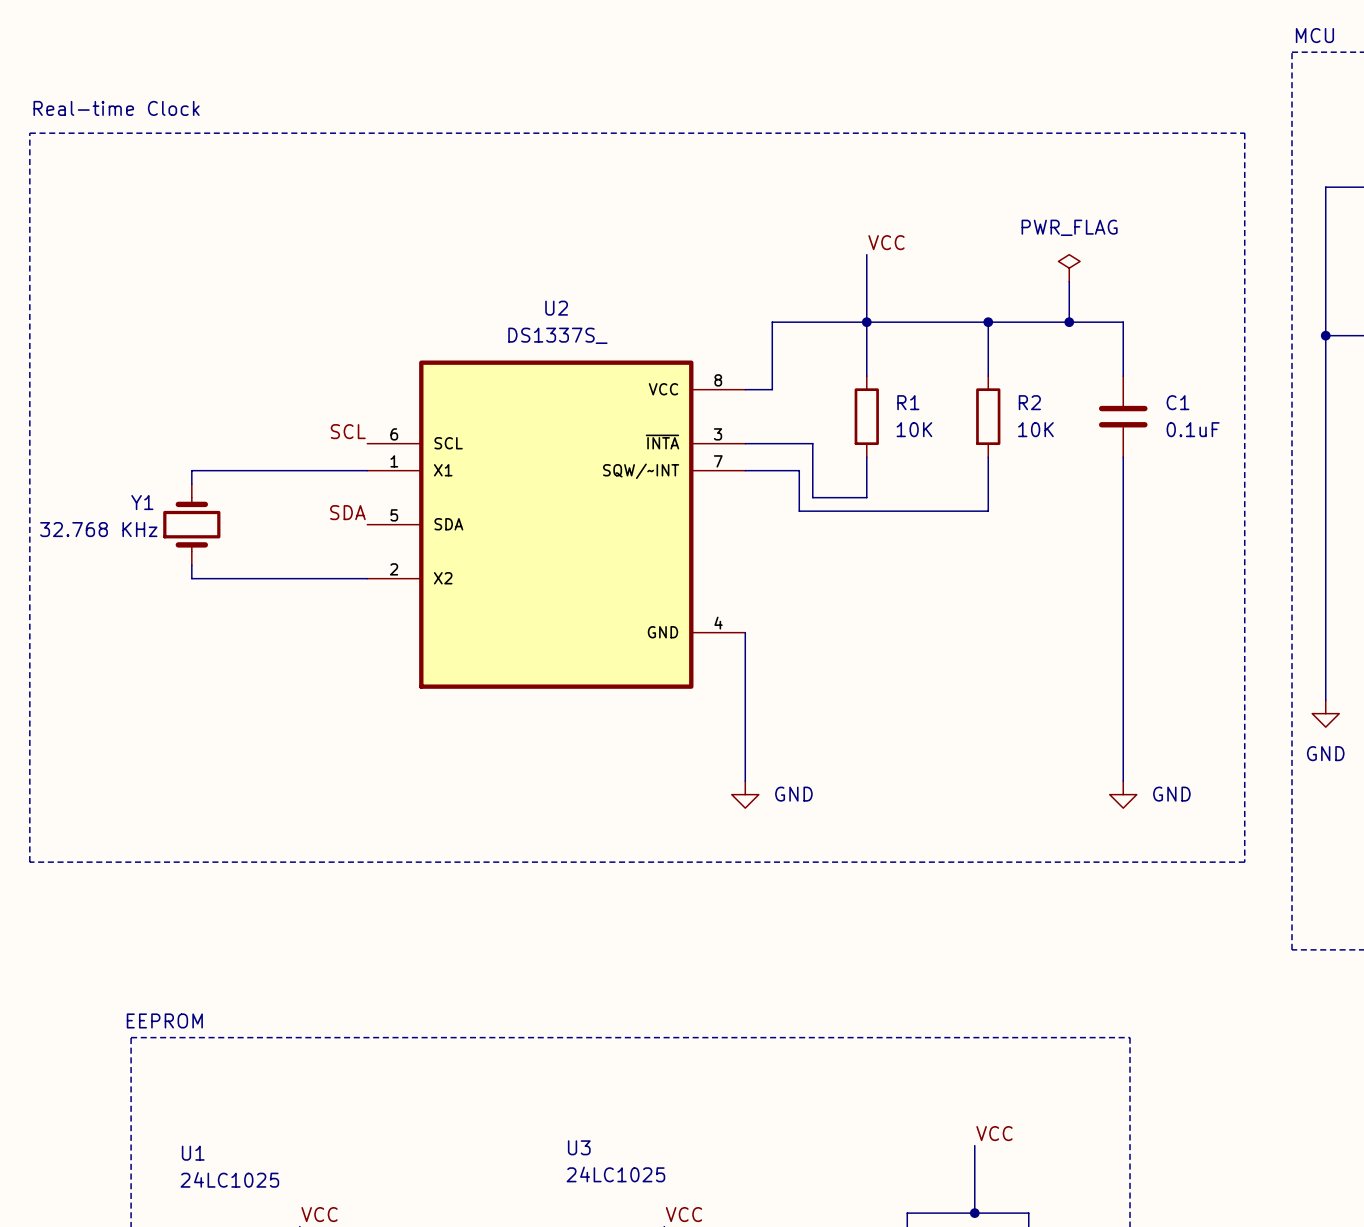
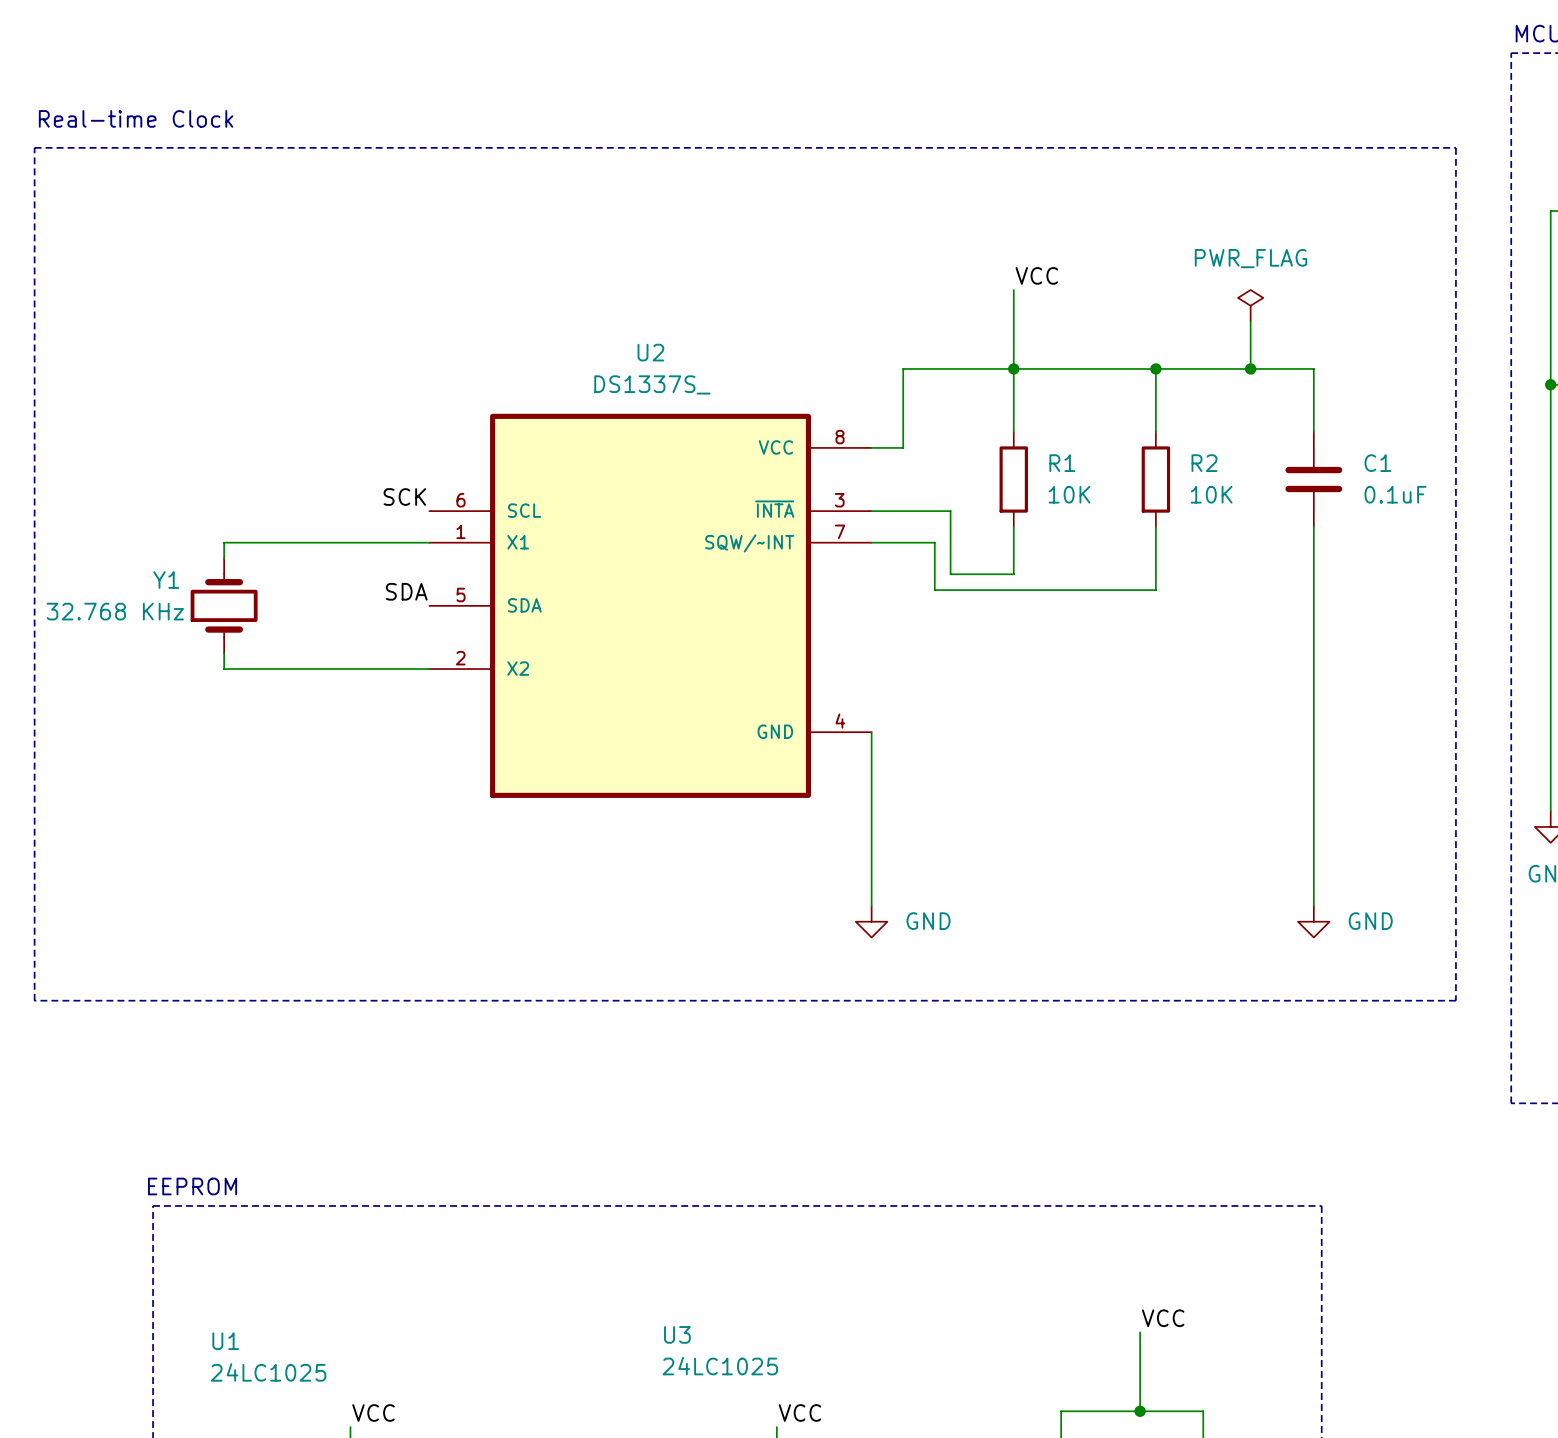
label: SCL (348, 431) -> SCK (404, 497)

